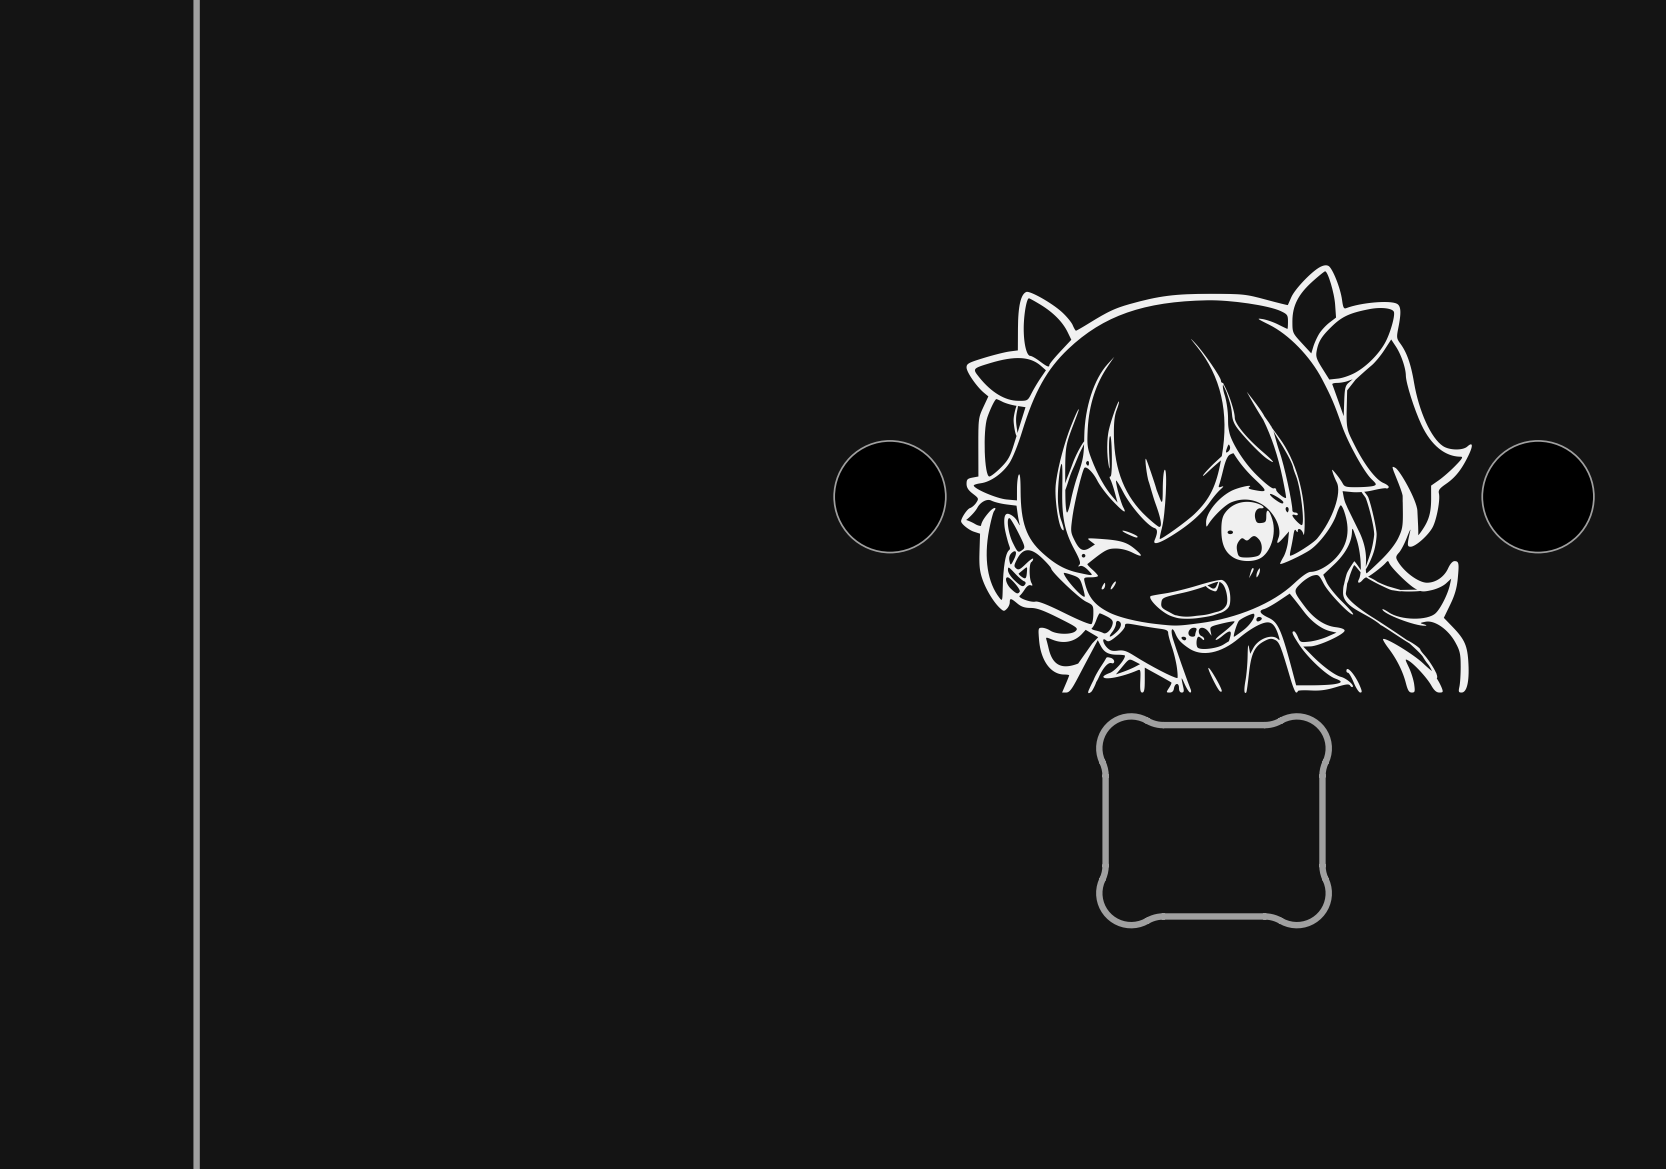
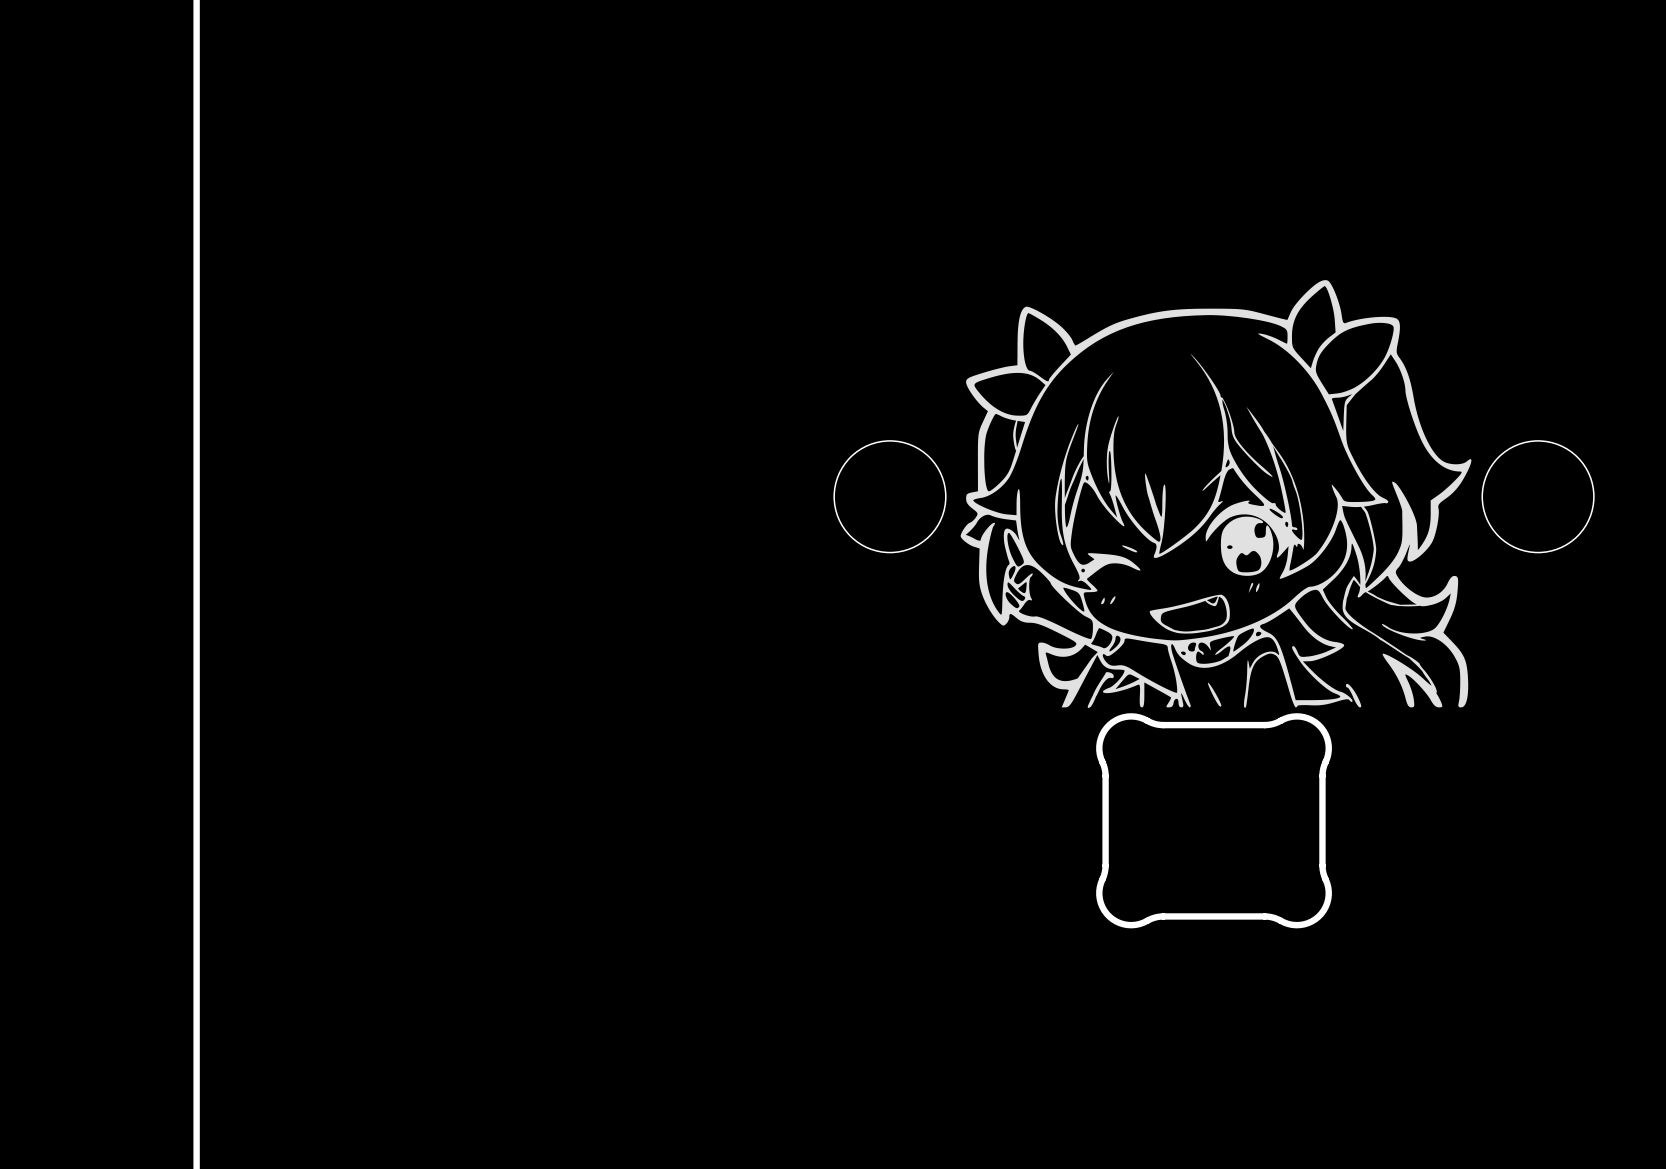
drawing position: (1216, 479) -> (1216, 493)
drawing position: (1247, 531) -> (1247, 546)
drawing position: (1129, 534) -> (1129, 548)
drawing position: (1258, 572) -> (1257, 587)
drawing position: (1251, 573) -> (1250, 587)
drawing position: (1113, 585) -> (1112, 600)
drawing position: (1103, 586) -> (1102, 600)
drawing position: (1190, 599) -> (1189, 614)
drawing position: (1101, 675) -> (1100, 690)
drawing position: (1215, 679) -> (1214, 694)
drawing position: (1354, 680) -> (1353, 695)

